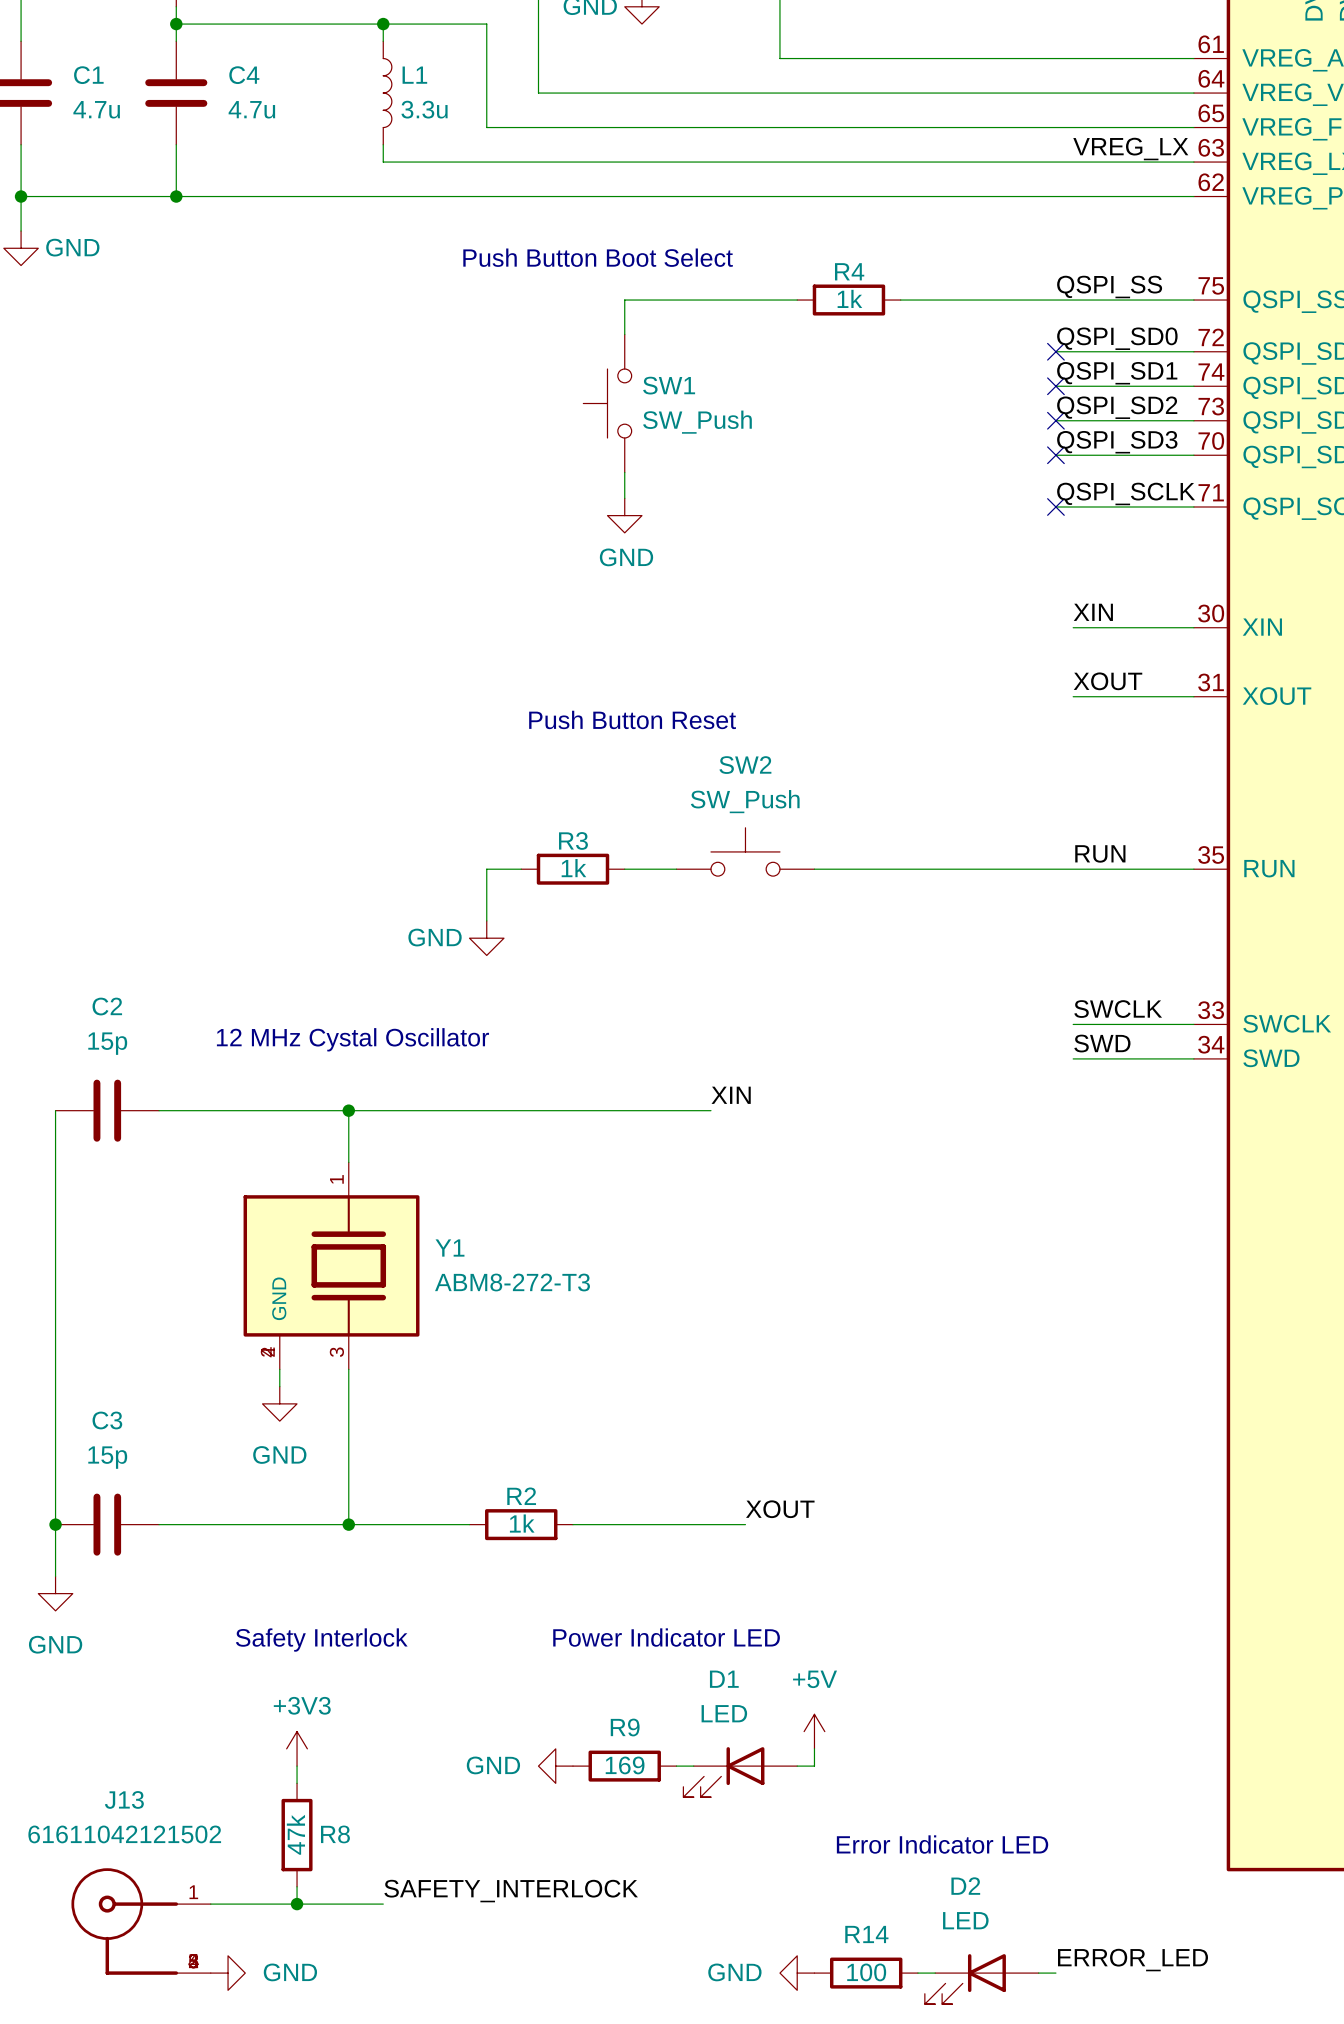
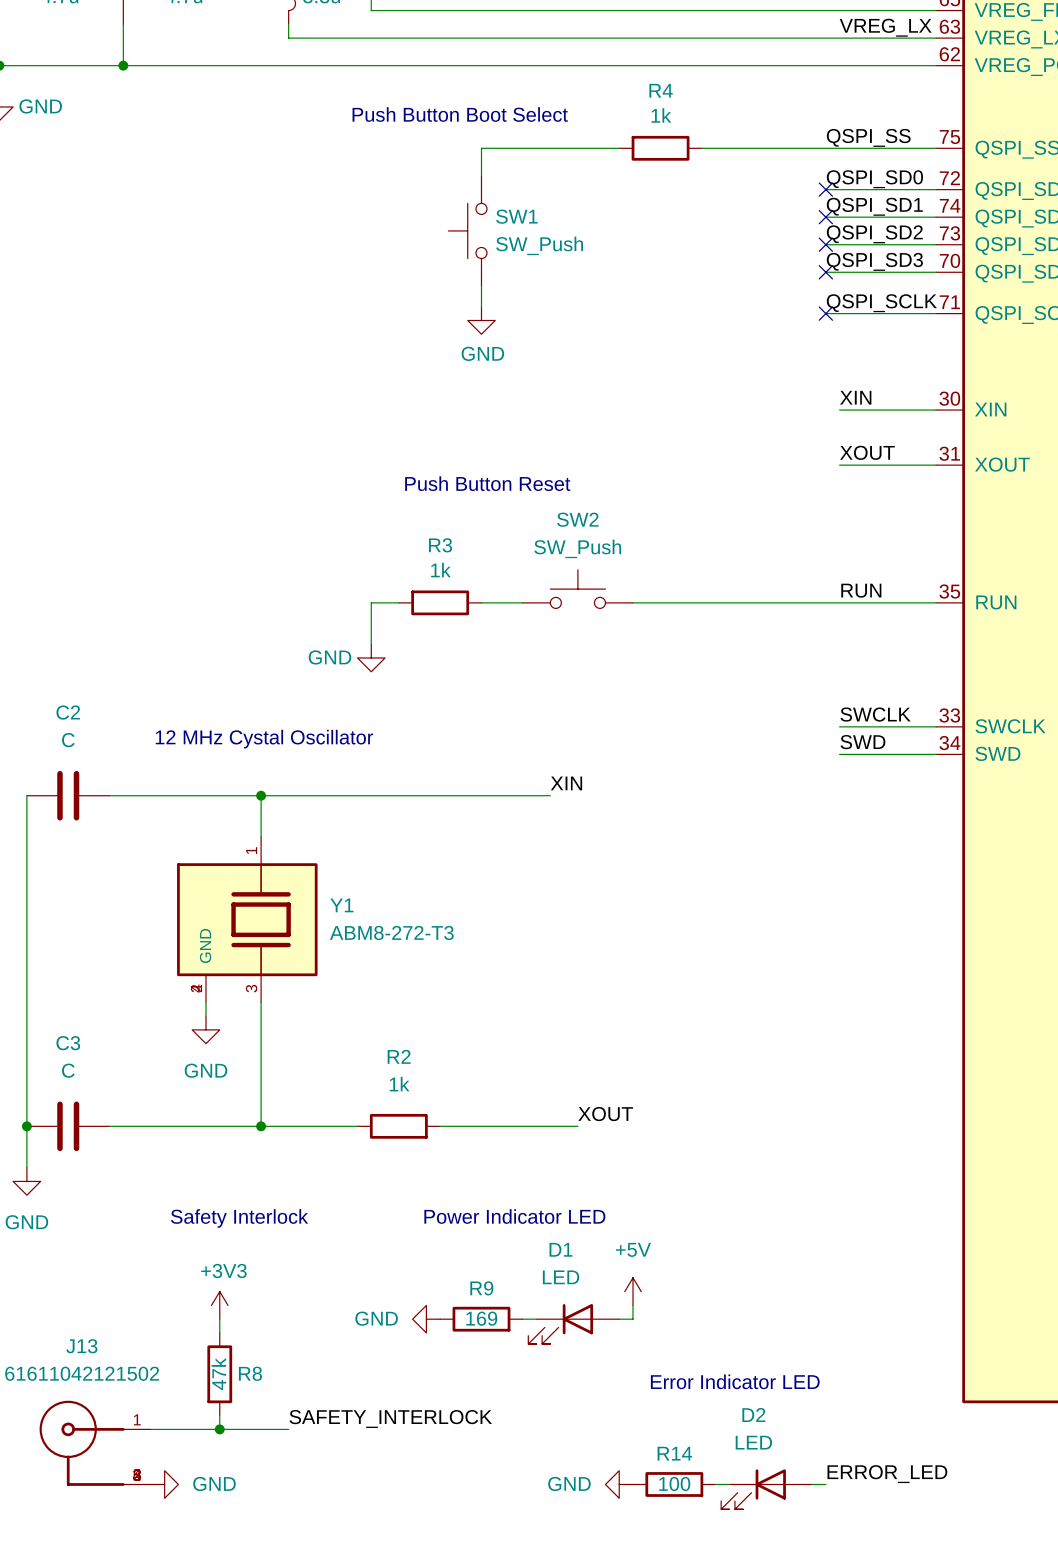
R4 name position: R4 (849, 271) -> R4 (661, 90)
R4 value position: 1k (849, 298) -> 1k (661, 115)
R3 name position: R3 (573, 840) -> R3 (440, 545)
R3 value position: 1k (573, 868) -> 1k (440, 570)
C2 value: 15p (107, 1043) -> C (68, 740)
C3 value: 15p (107, 1457) -> C (68, 1070)
R2 name position: R2 (521, 1496) -> R2 (399, 1056)
R2 value position: 1k (522, 1523) -> 1k (399, 1084)

